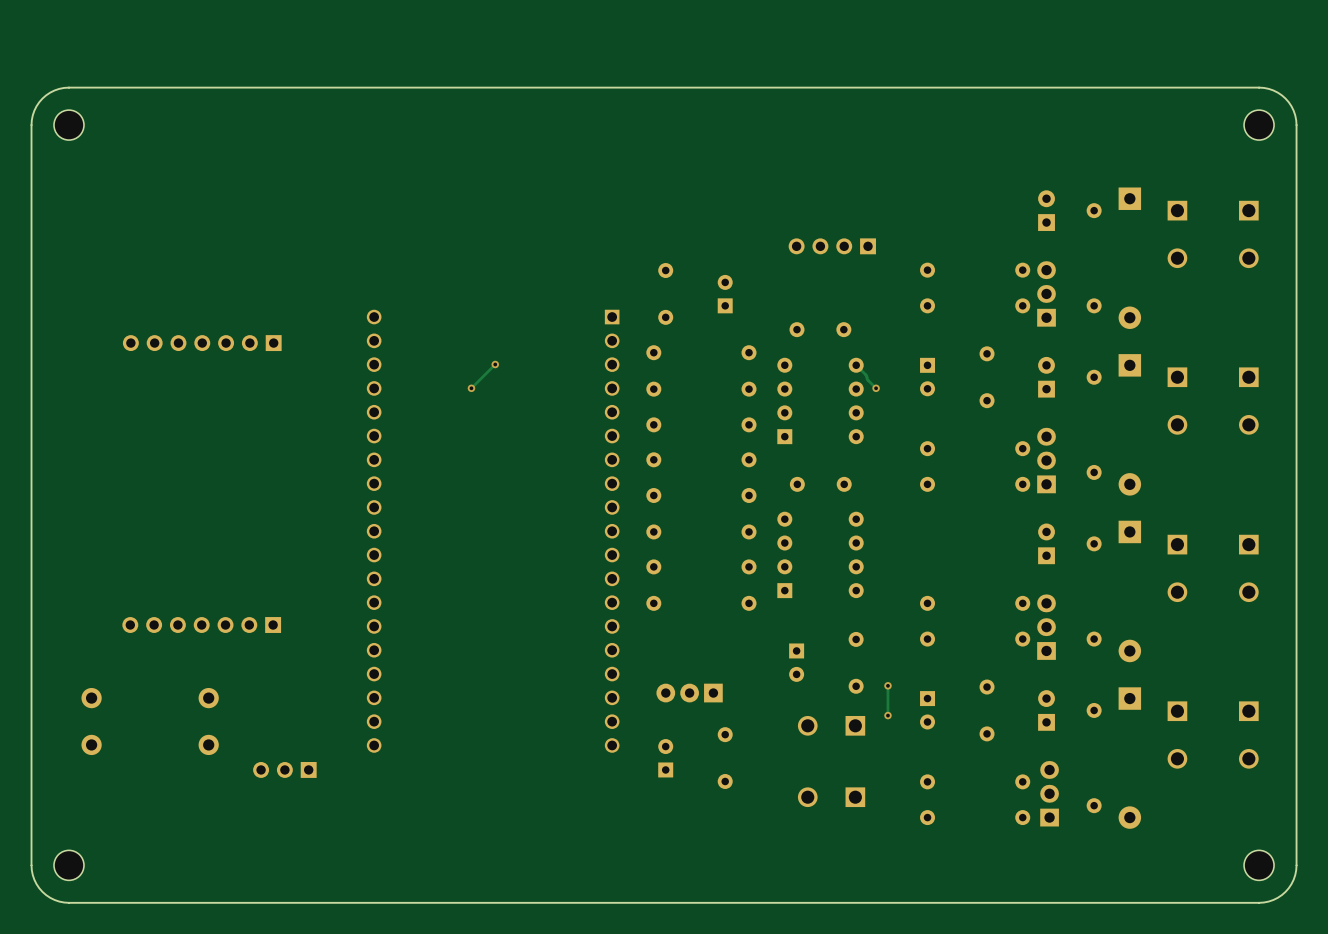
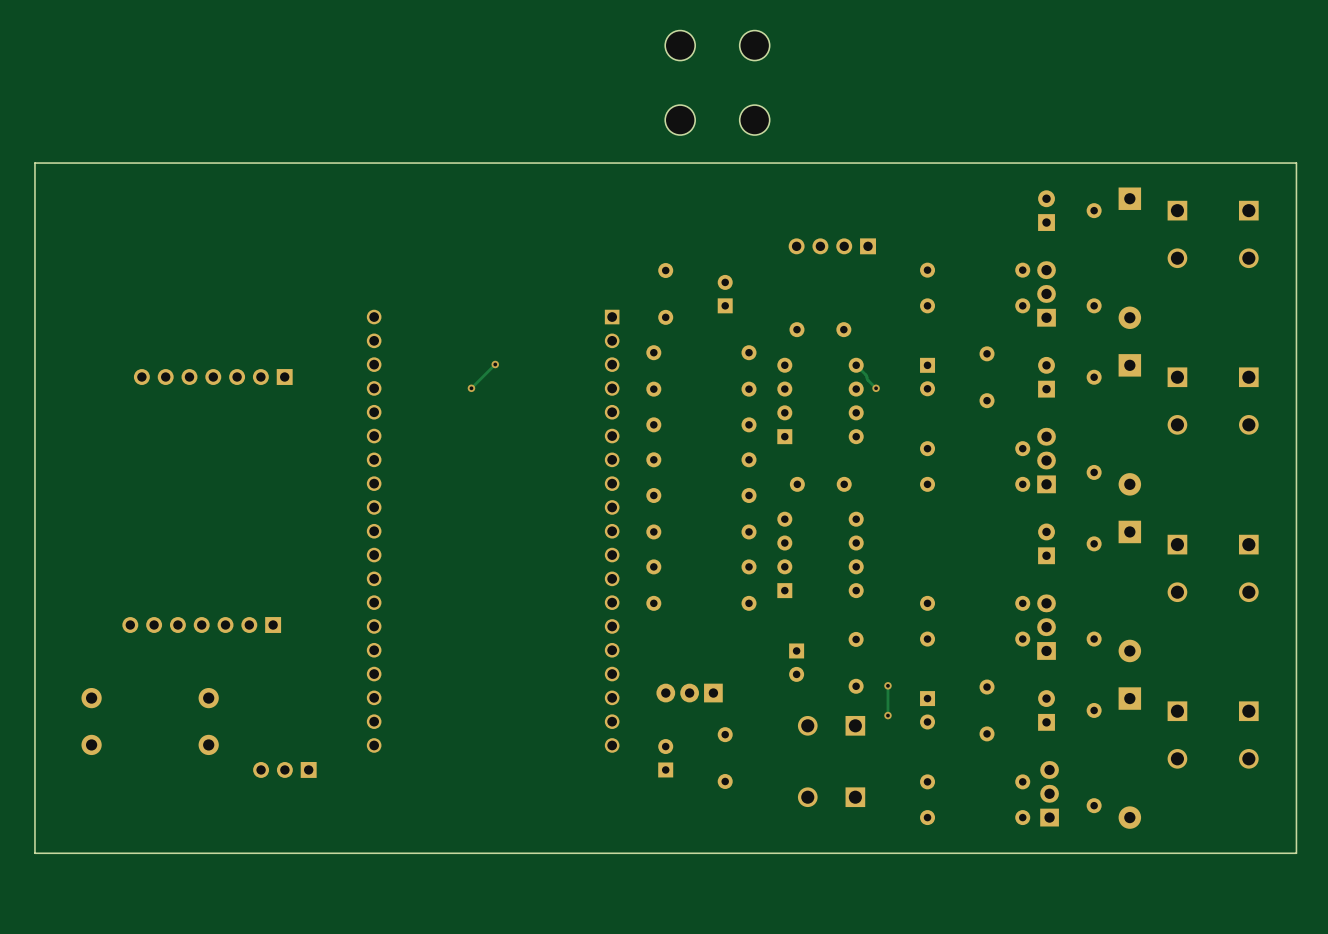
part: none -> (680, 45)
part: none -> (754, 45)
board edge: (1259, 87) (68, 87) (50, 92) (36, 106) (31, 125) (31, 865) (36, 884) (50, 897) (68, 902) (1259, 902) (1277, 897) (1291, 884) (1296, 865) (1296, 125) (1293, 110) (1285, 98) (1273, 90) (1259, 87) -> (1296, 163) (1296, 853) (34, 853) (34, 163) (1296, 163)
part: none -> (680, 120)
part: none -> (754, 120)
part: (68, 125) -> none
part: (1259, 125) -> none
part position: (202, 343) -> (213, 377)
part: (68, 865) -> none
part: (1259, 865) -> none

